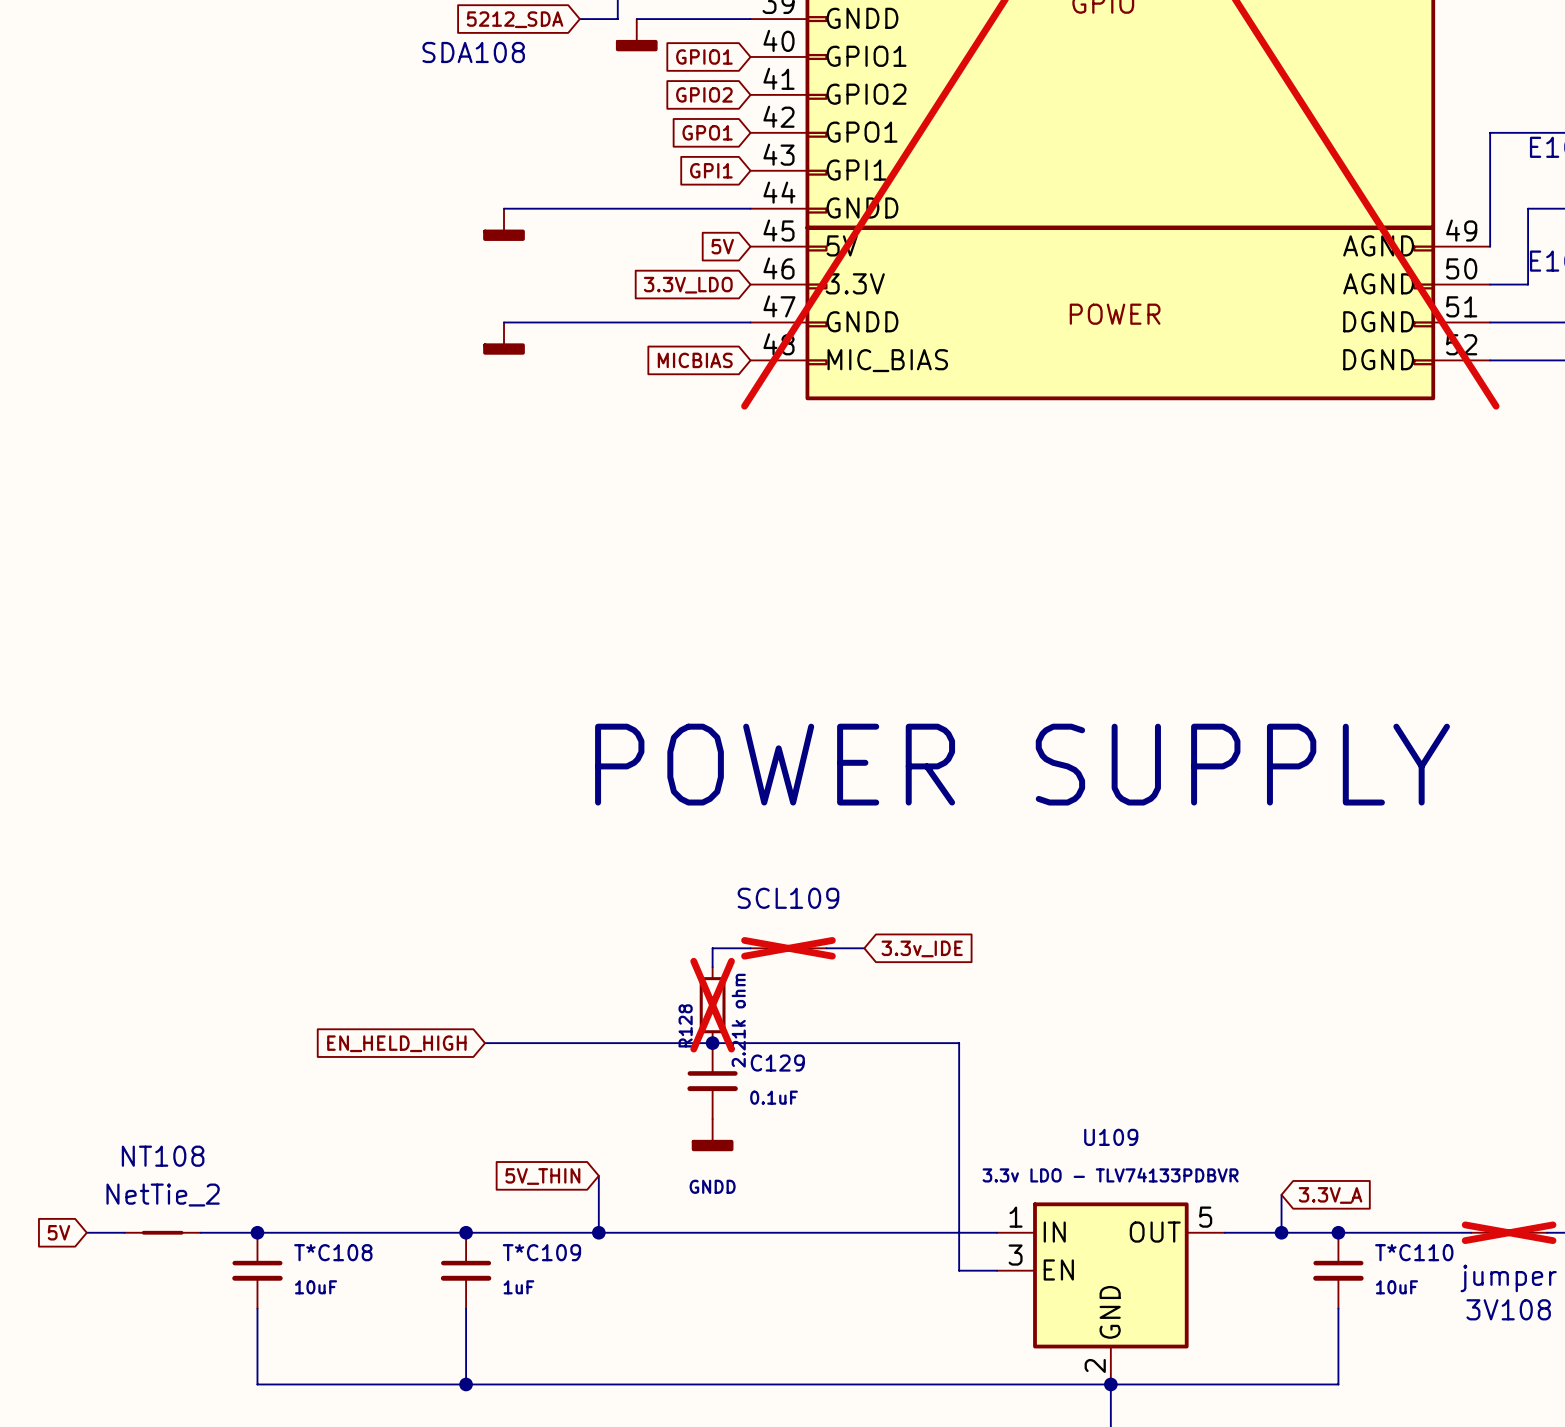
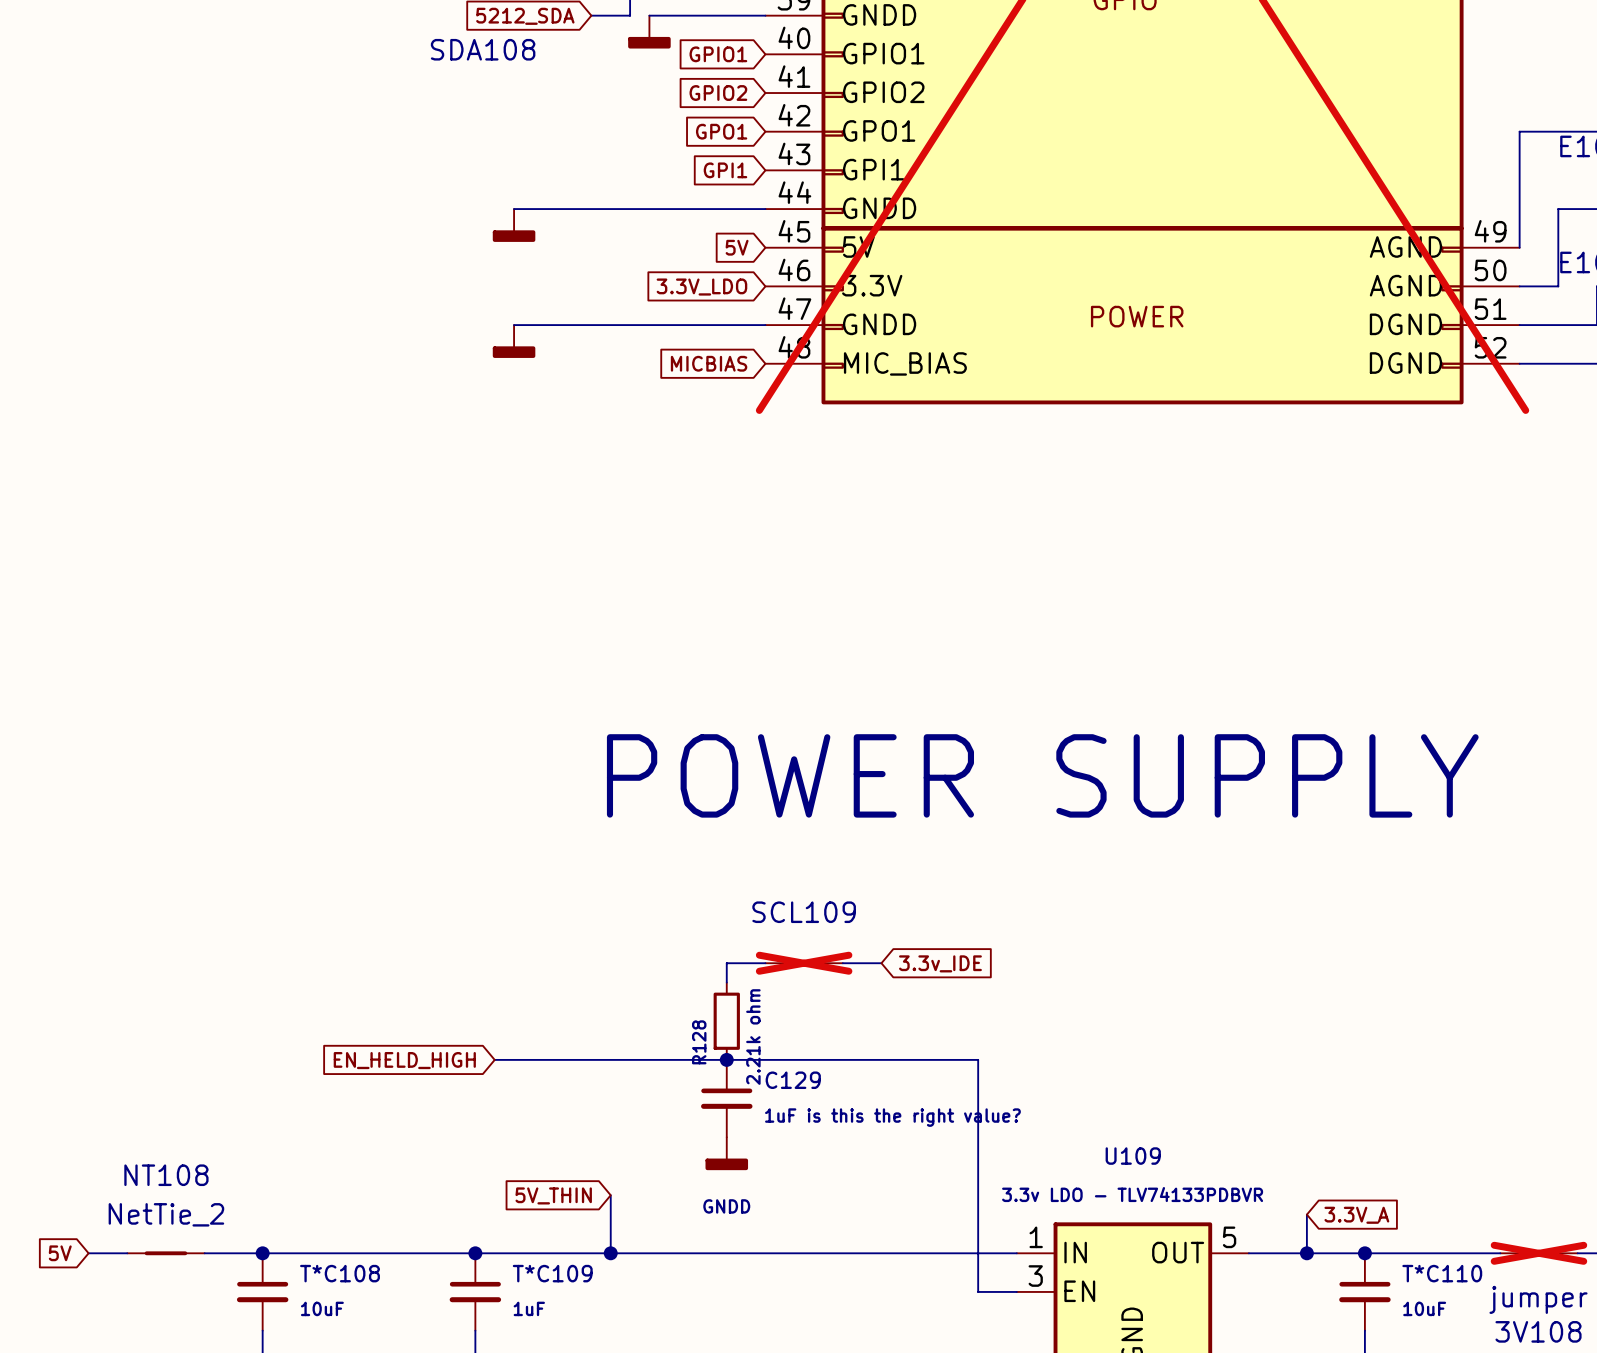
R128 do-not-place cross: (712, 1005) -> none
C129 value: 0.1uF (774, 1097) -> 1uF is this the right value? (892, 1117)

